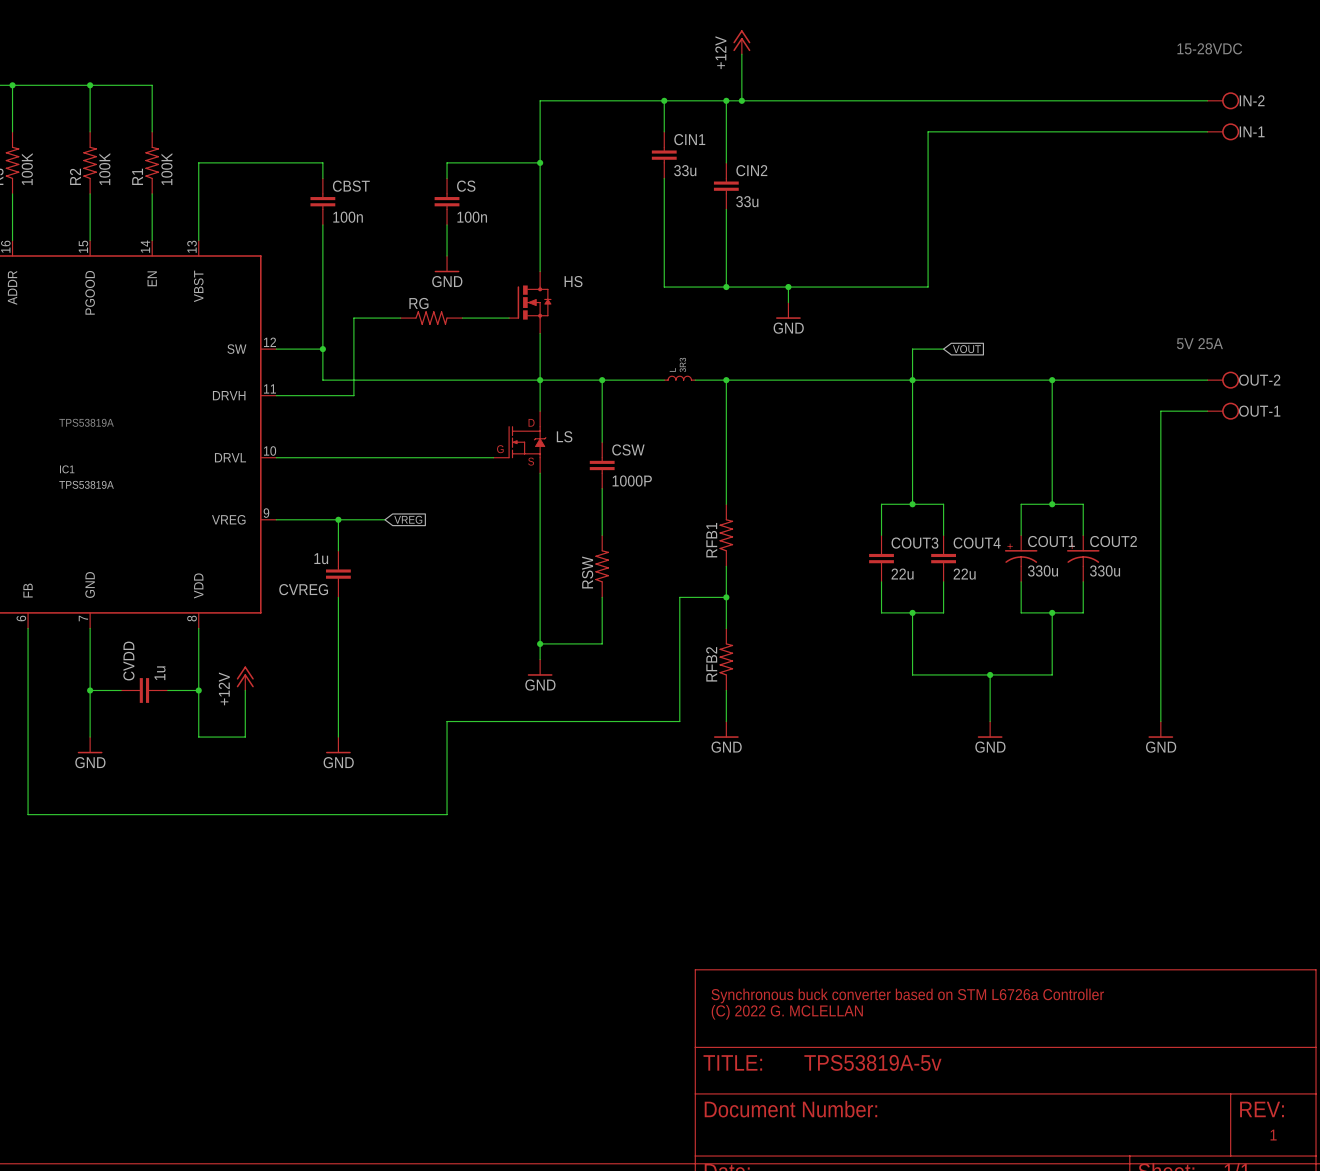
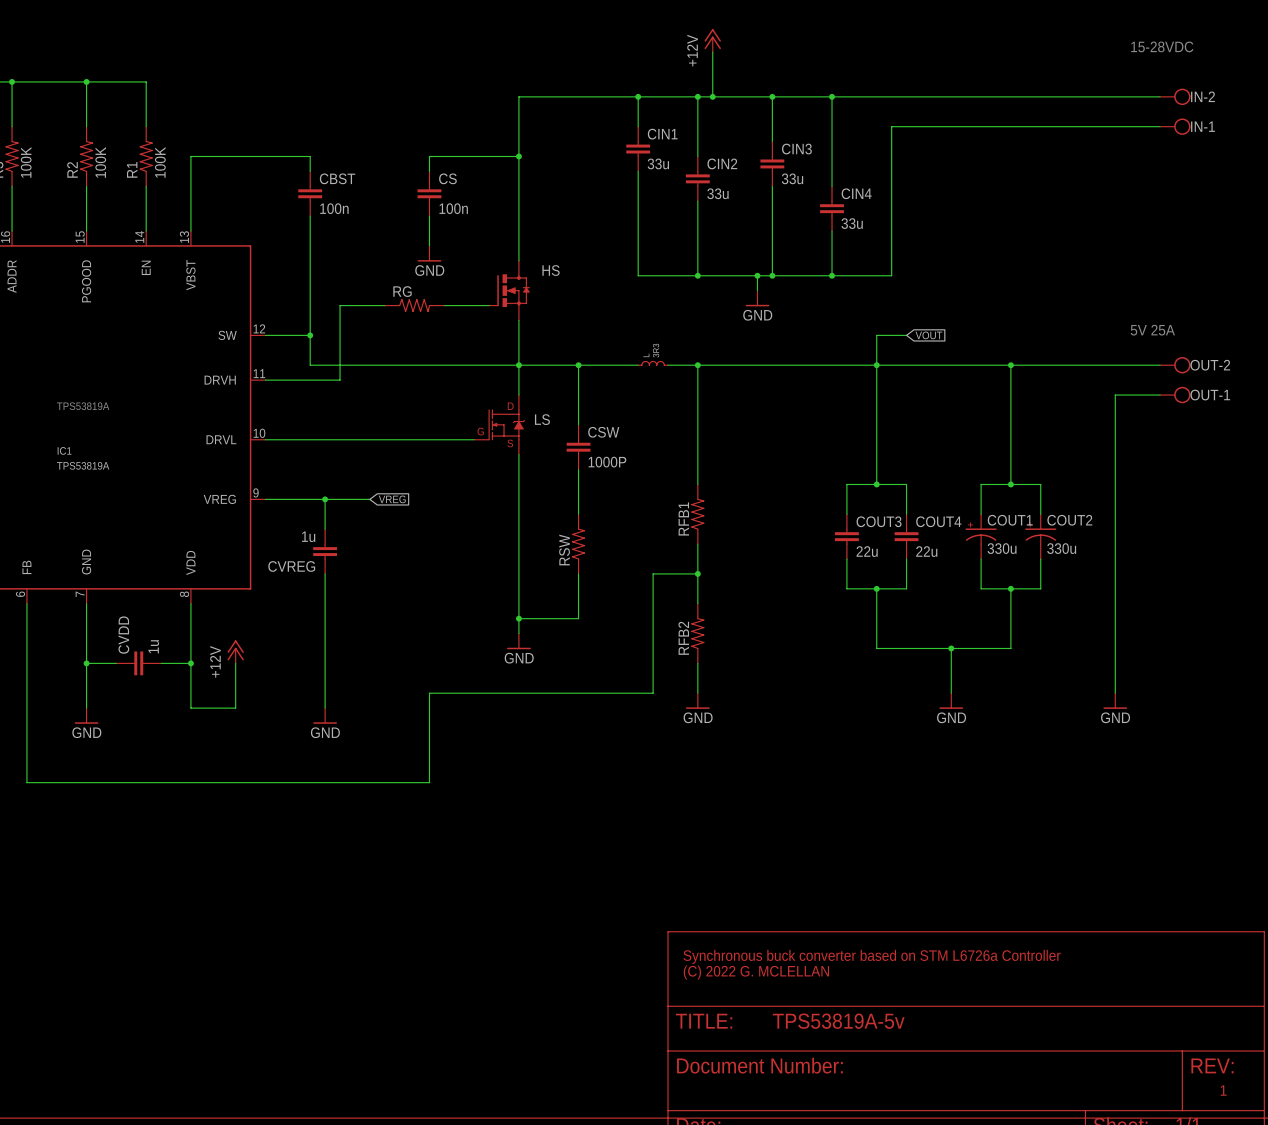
wire: none -> (772, 96) (772, 141)
junction: none -> (772, 96)
wire: none -> (832, 96) (832, 186)
junction: none -> (832, 96)
CIN3: none -> 33u (772, 163)
wire: none -> (772, 186) (772, 275)
CIN4: none -> 33u (832, 208)
wire: none -> (832, 231) (832, 275)
junction: none -> (772, 275)
junction: none -> (832, 275)

